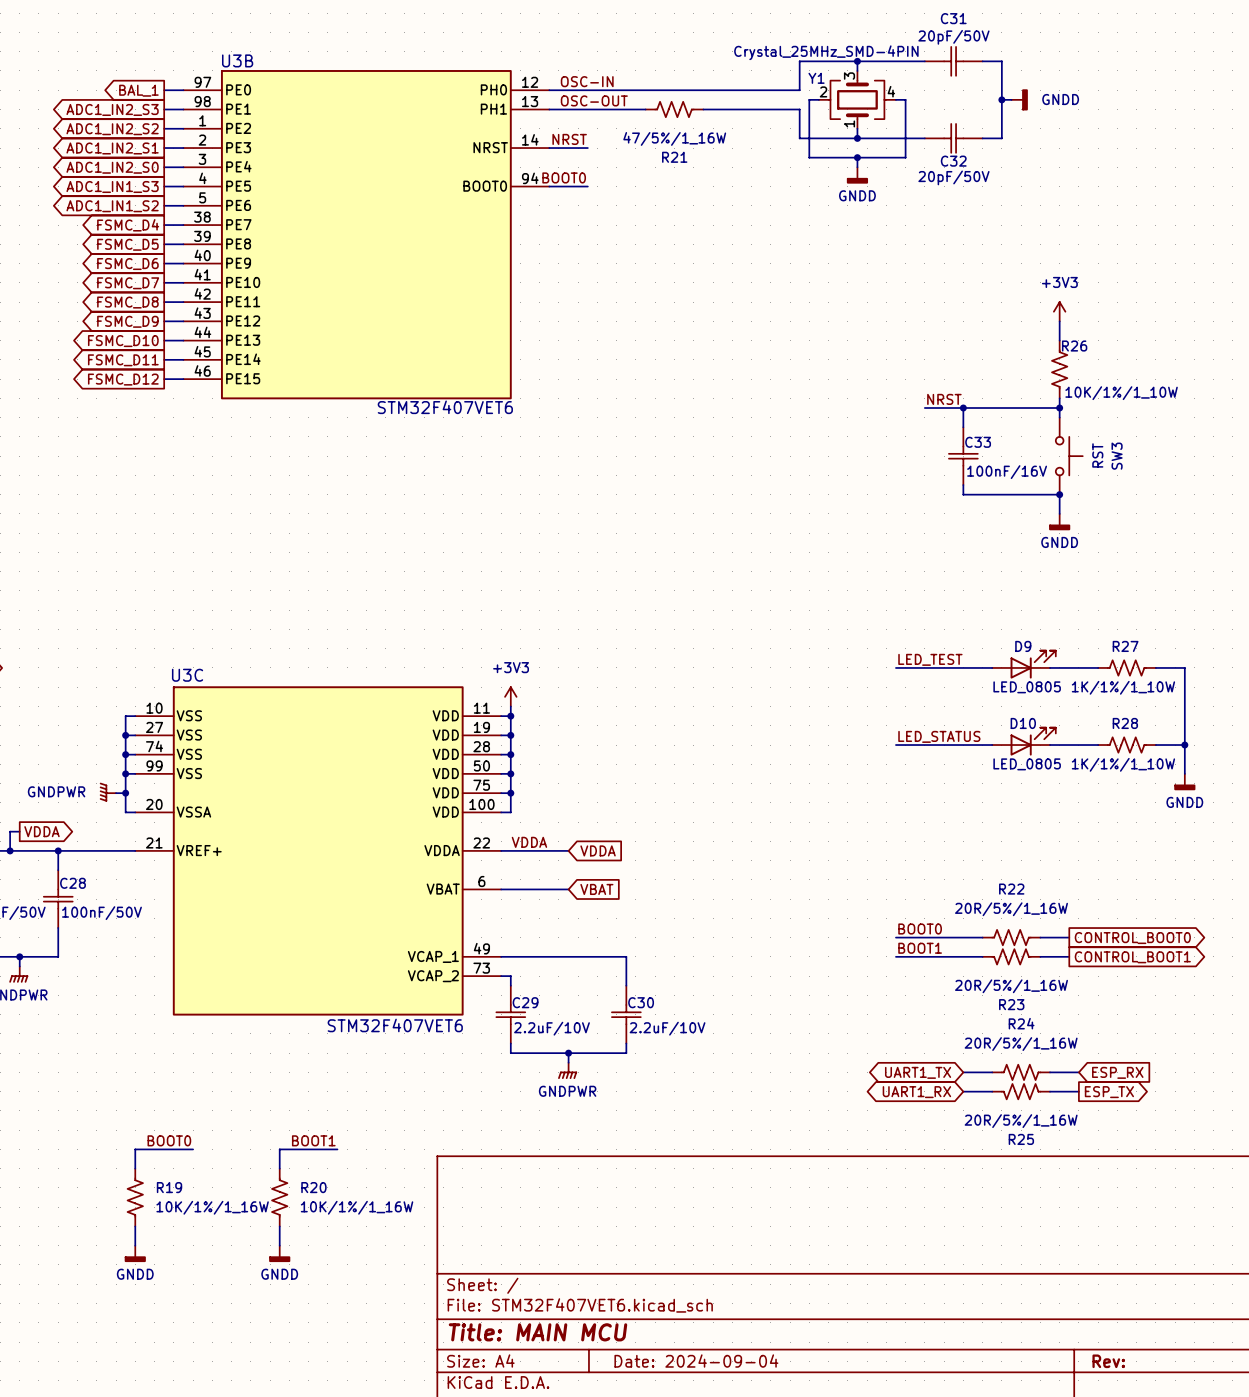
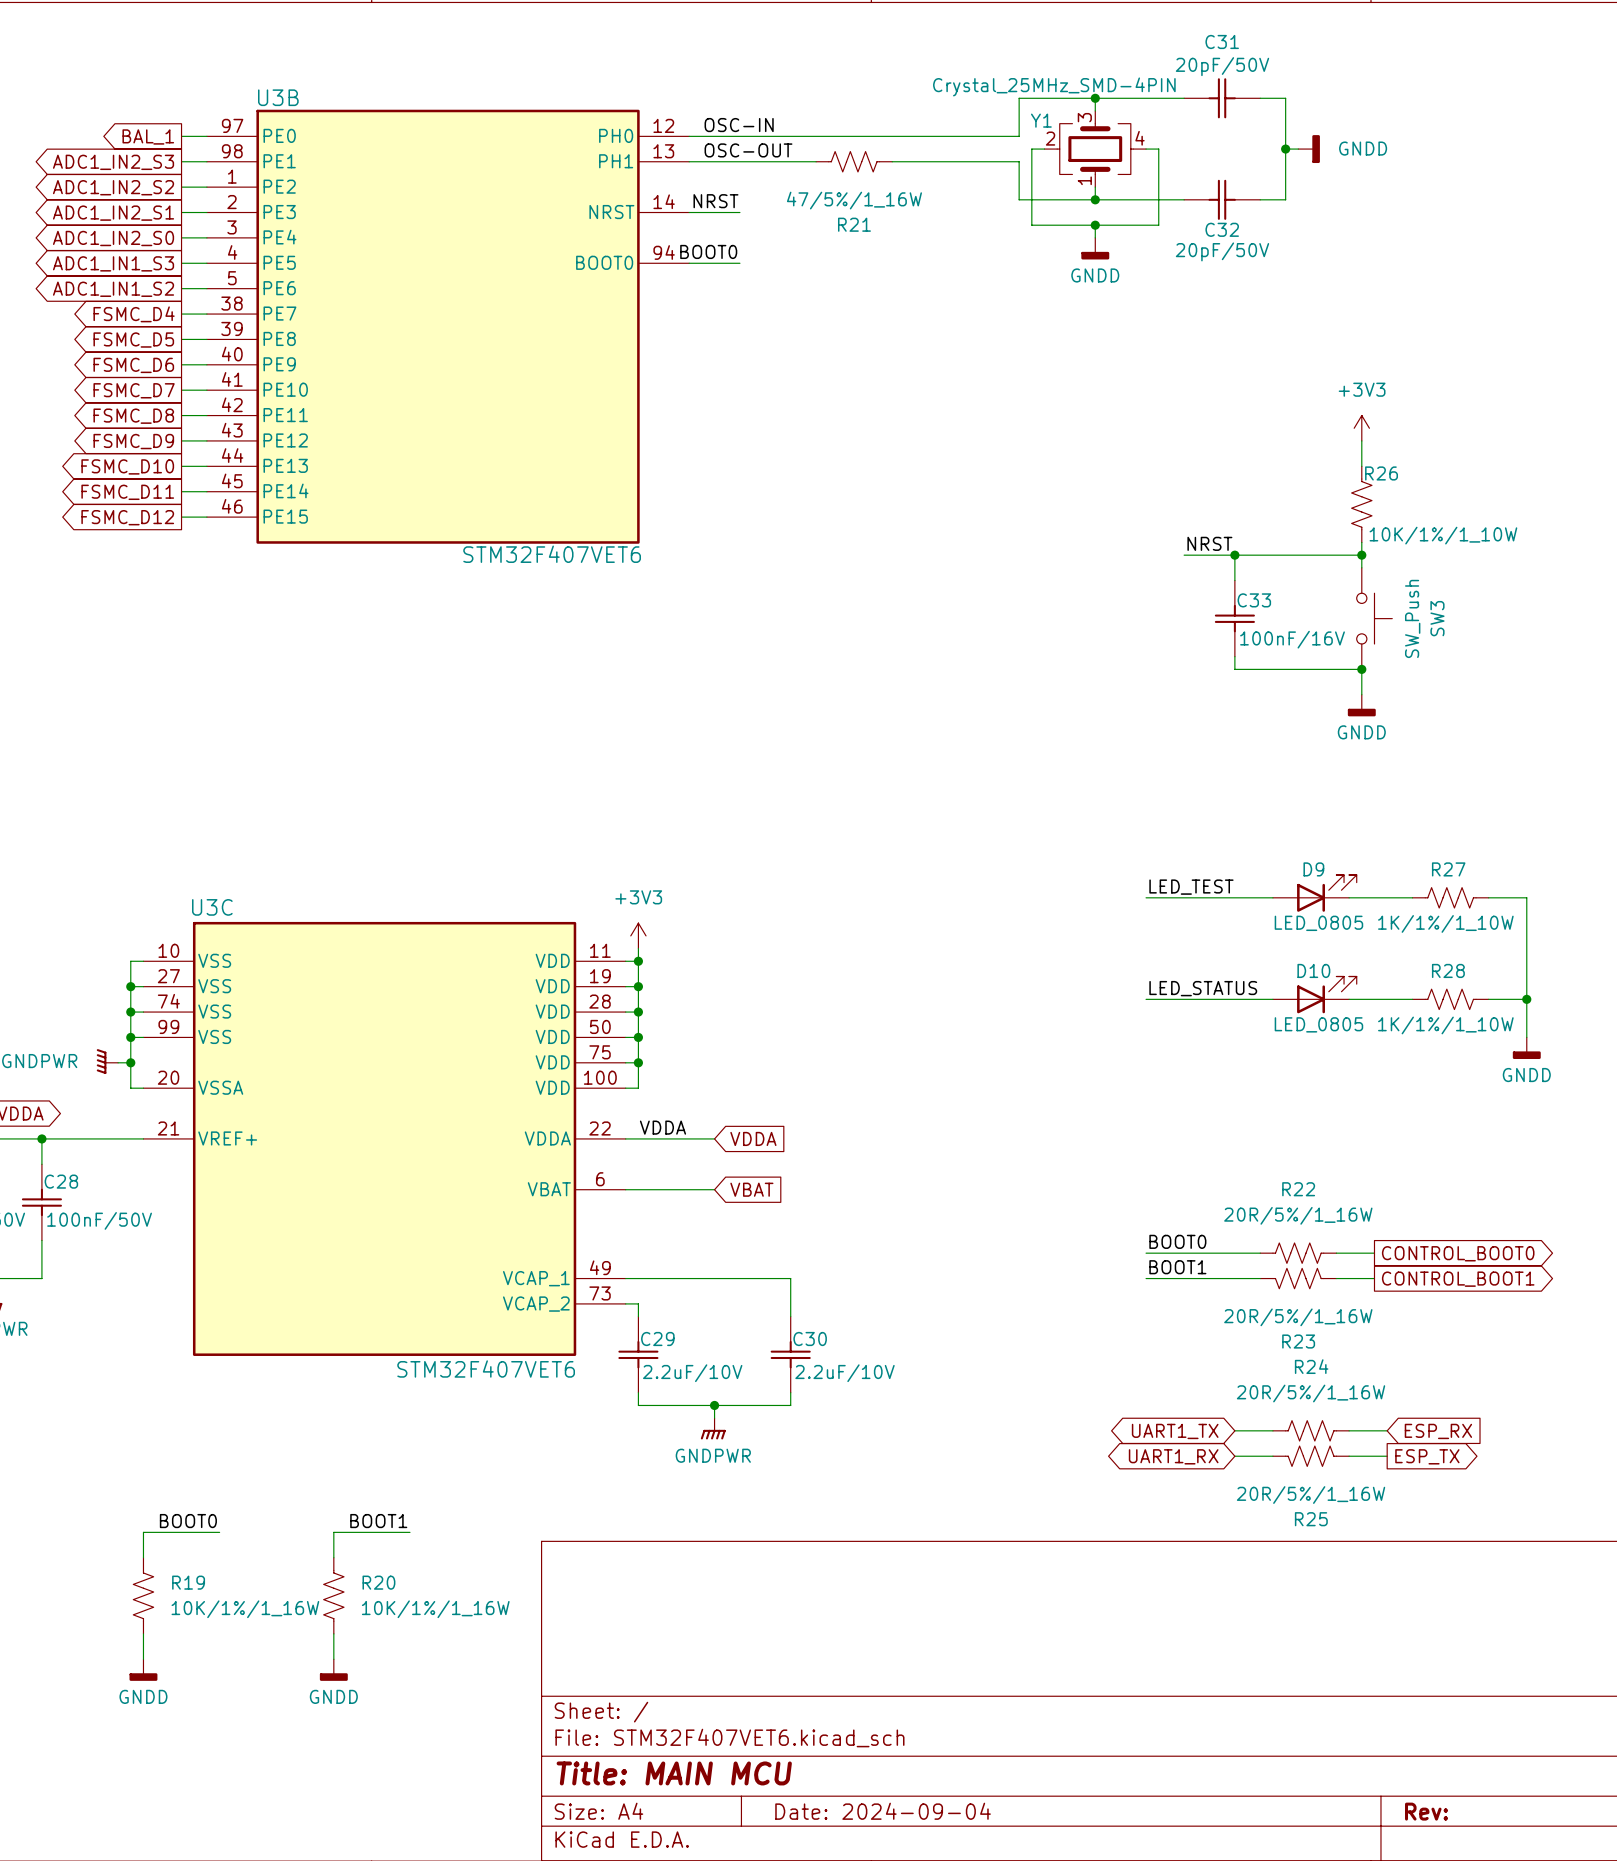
SW3 value: RST (1097, 455) -> SW_Push (1412, 618)

